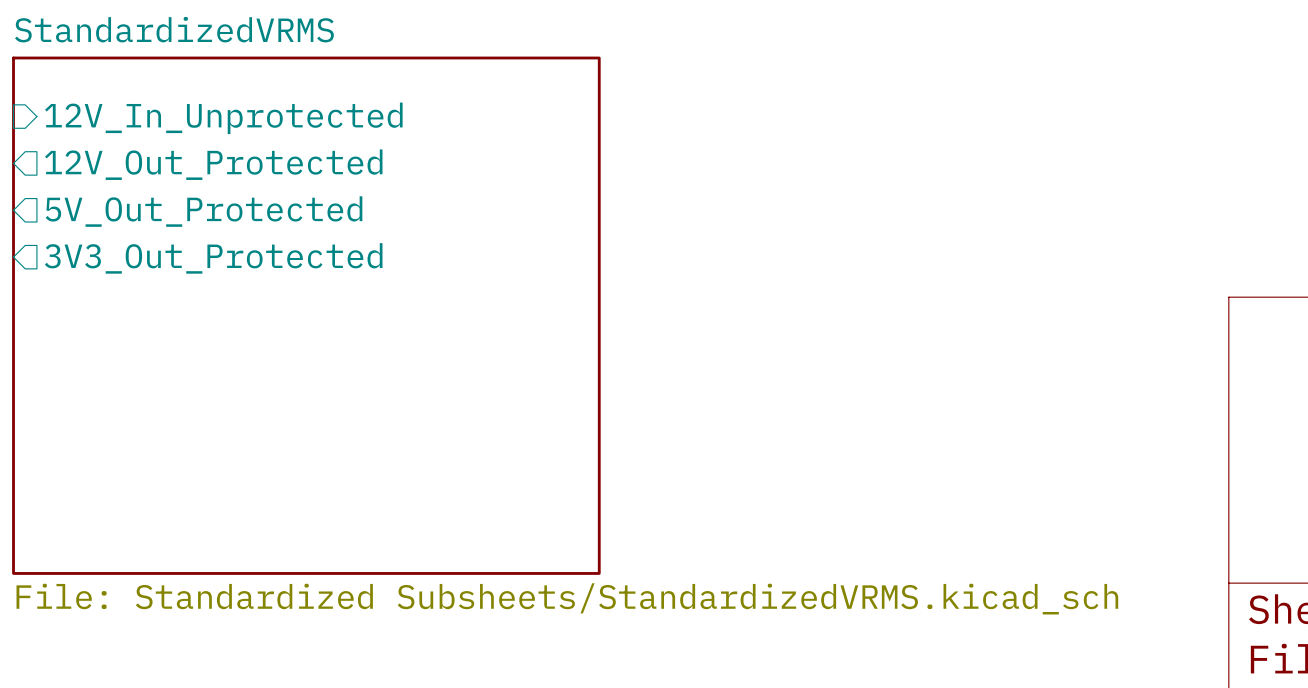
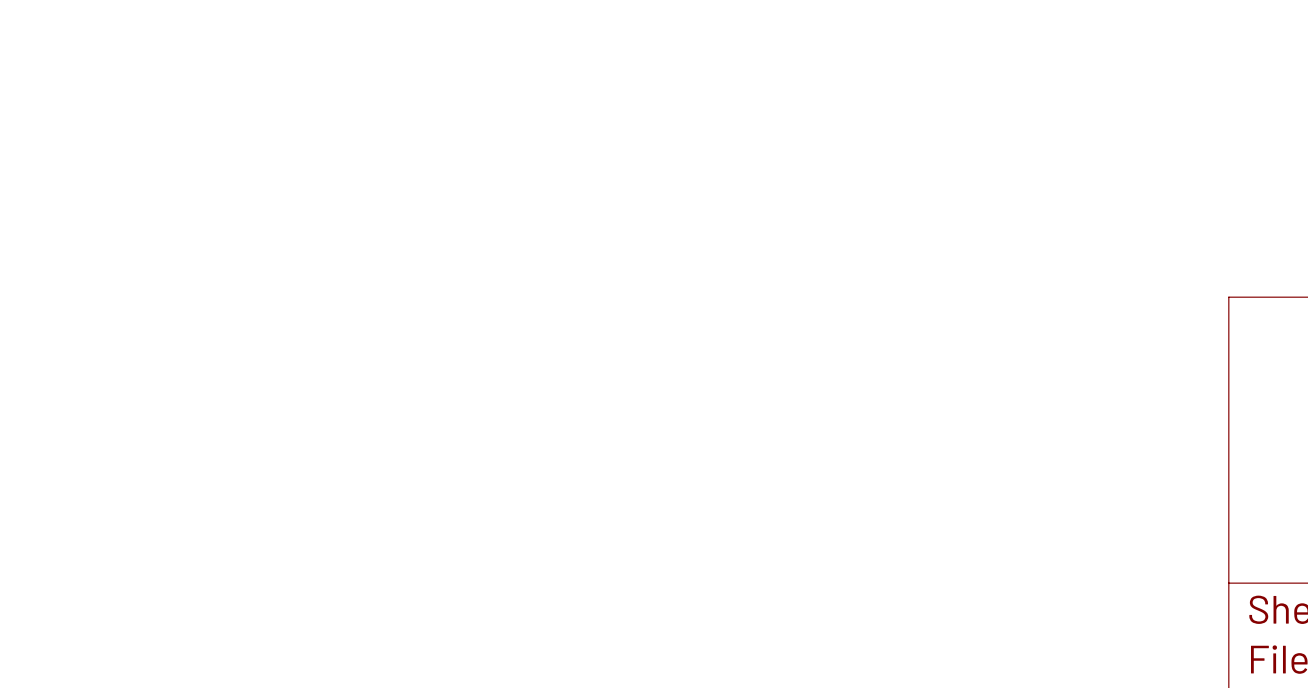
sheet pin: 12V_In_Unprotected (223, 118) -> none
sheet pin: 12V_Out_Protected (213, 164) -> none
sheet pin: 5V_Out_Protected (204, 211) -> none
sheet pin: 3V3_Out_Protected (213, 258) -> none
sheet StandardizedVRMS: File: Standardized Subsheets/StandardizedVRMS.kicad_sch (306, 315) -> none

